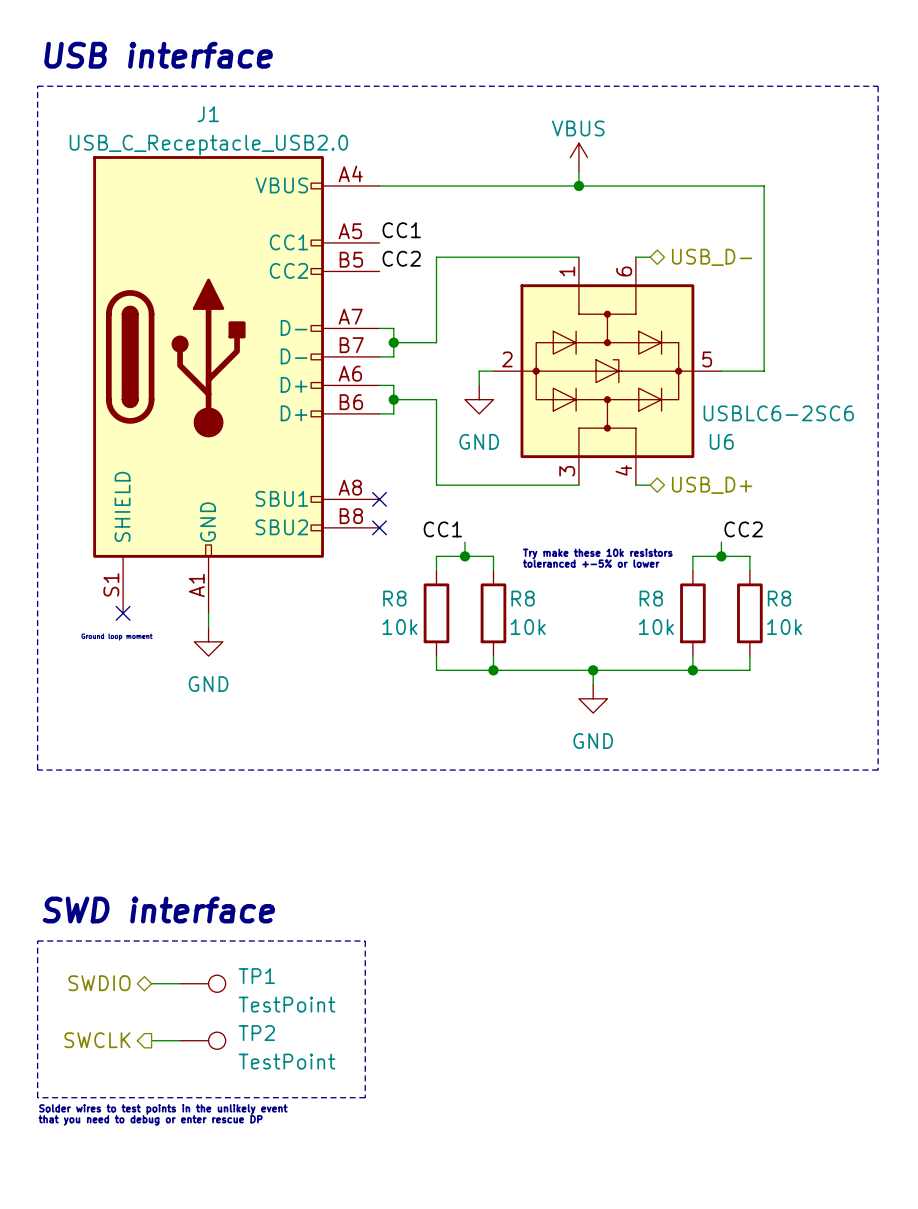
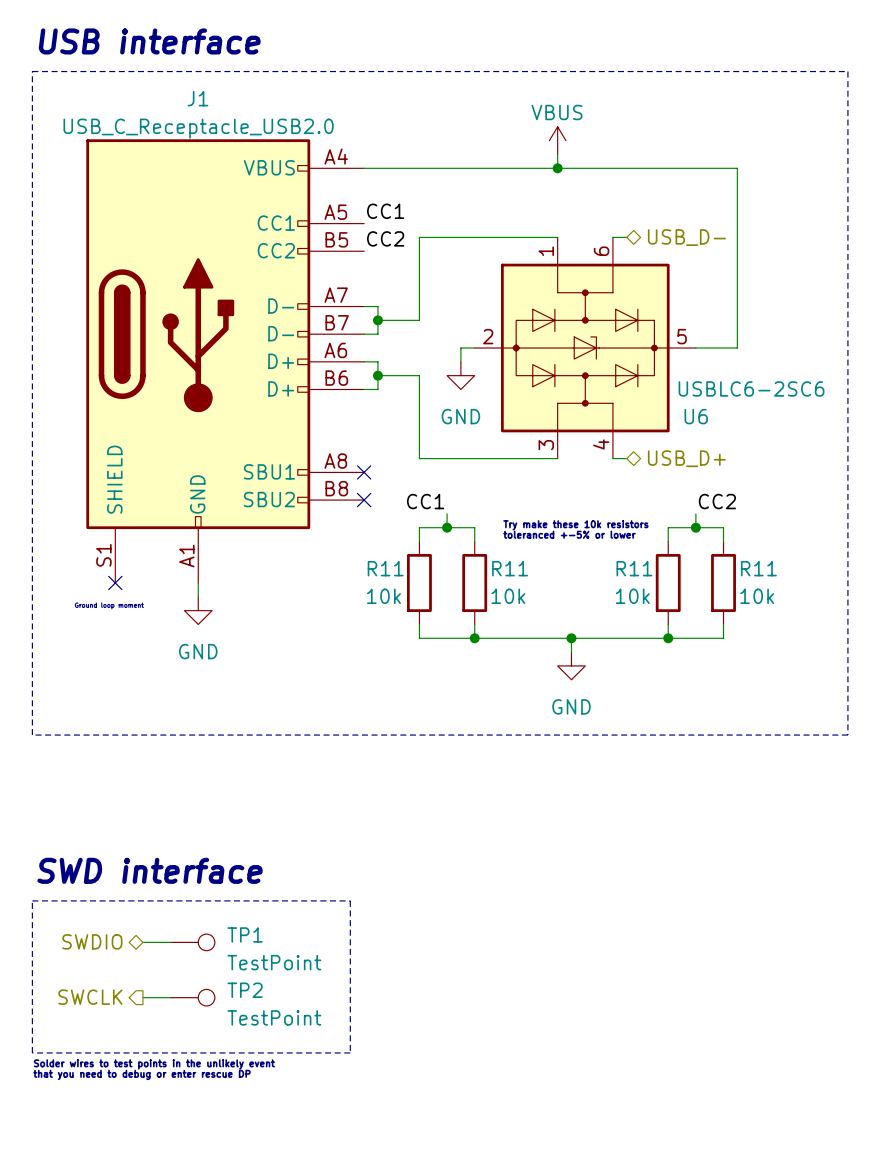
R8 name: R8 (394, 598) -> R11 (385, 568)
R8 name: R8 (523, 598) -> R11 (510, 568)
R8 name: R8 (651, 598) -> R11 (634, 568)
R8 name: R8 (779, 598) -> R11 (758, 568)

